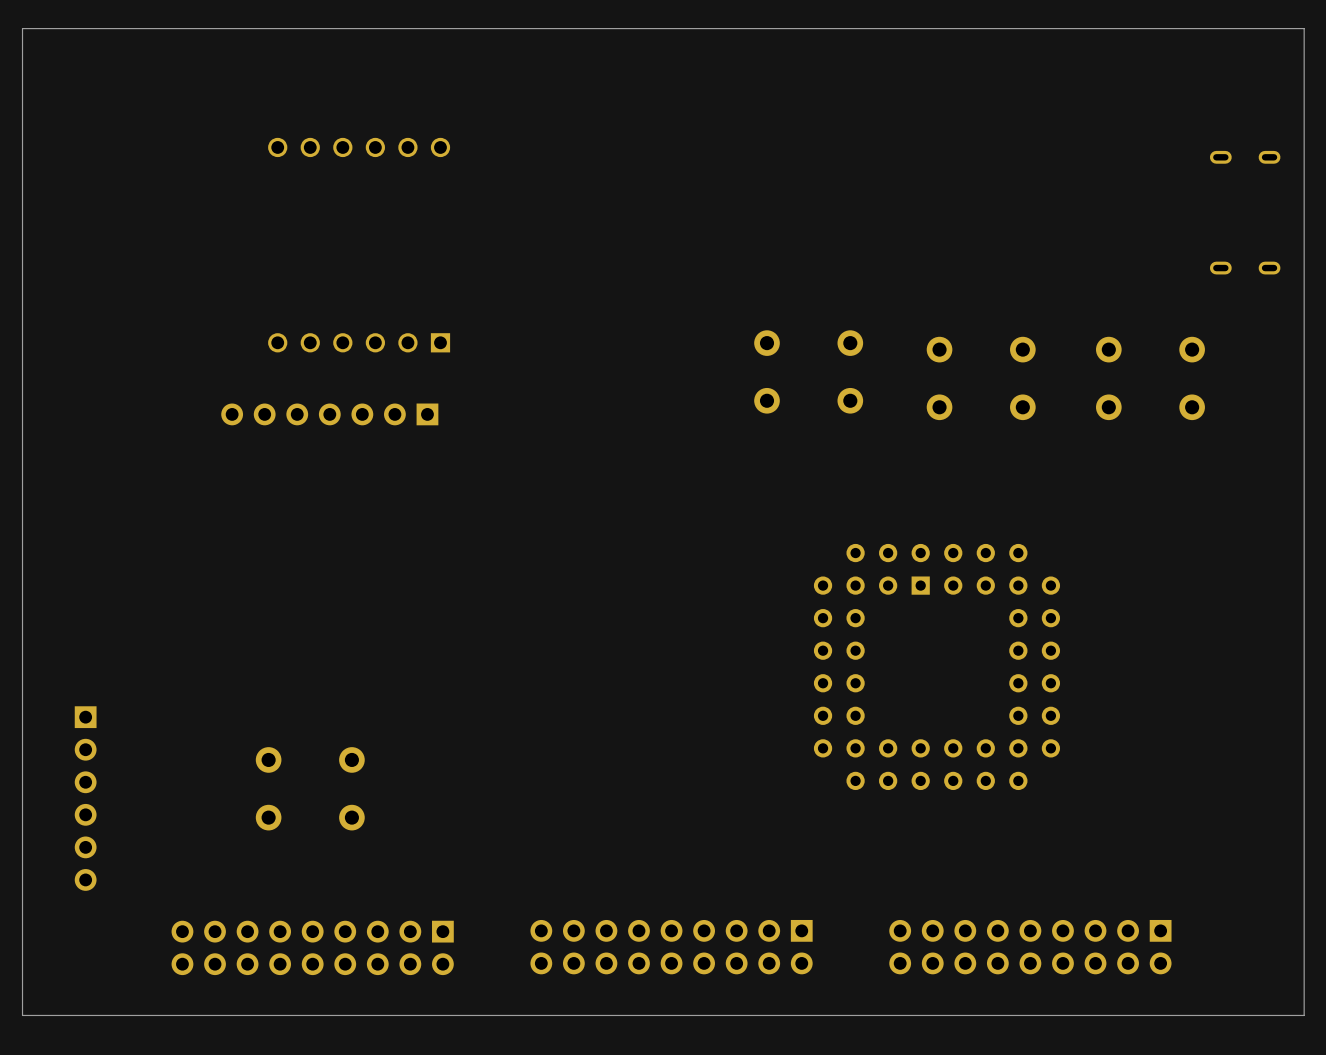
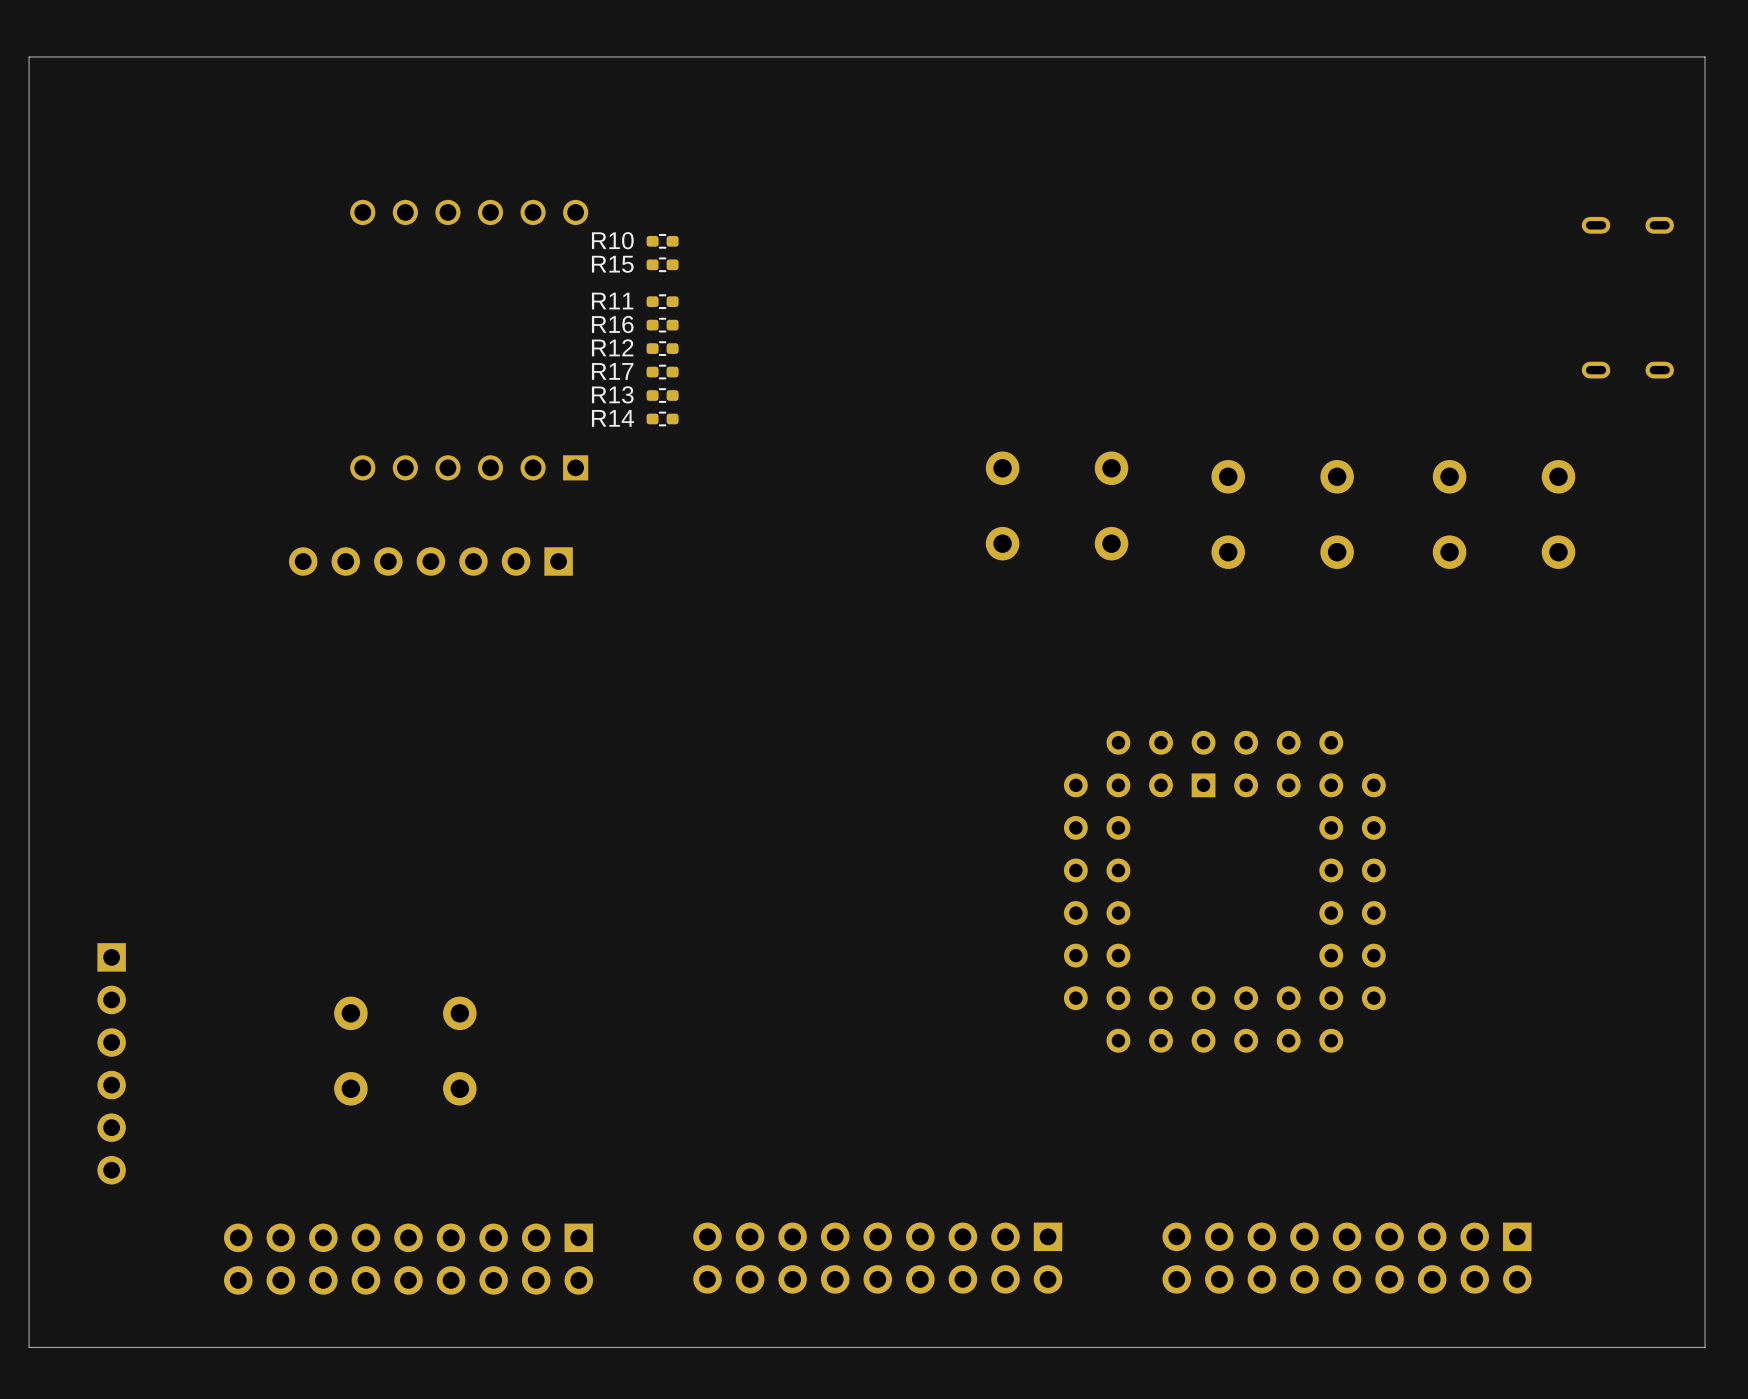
R10: none -> (662, 241)
R15: none -> (662, 264)
R11: none -> (662, 301)
R16: none -> (662, 325)
R12: none -> (662, 348)
R17: none -> (662, 372)
R13: none -> (662, 395)
R14: none -> (662, 418)

